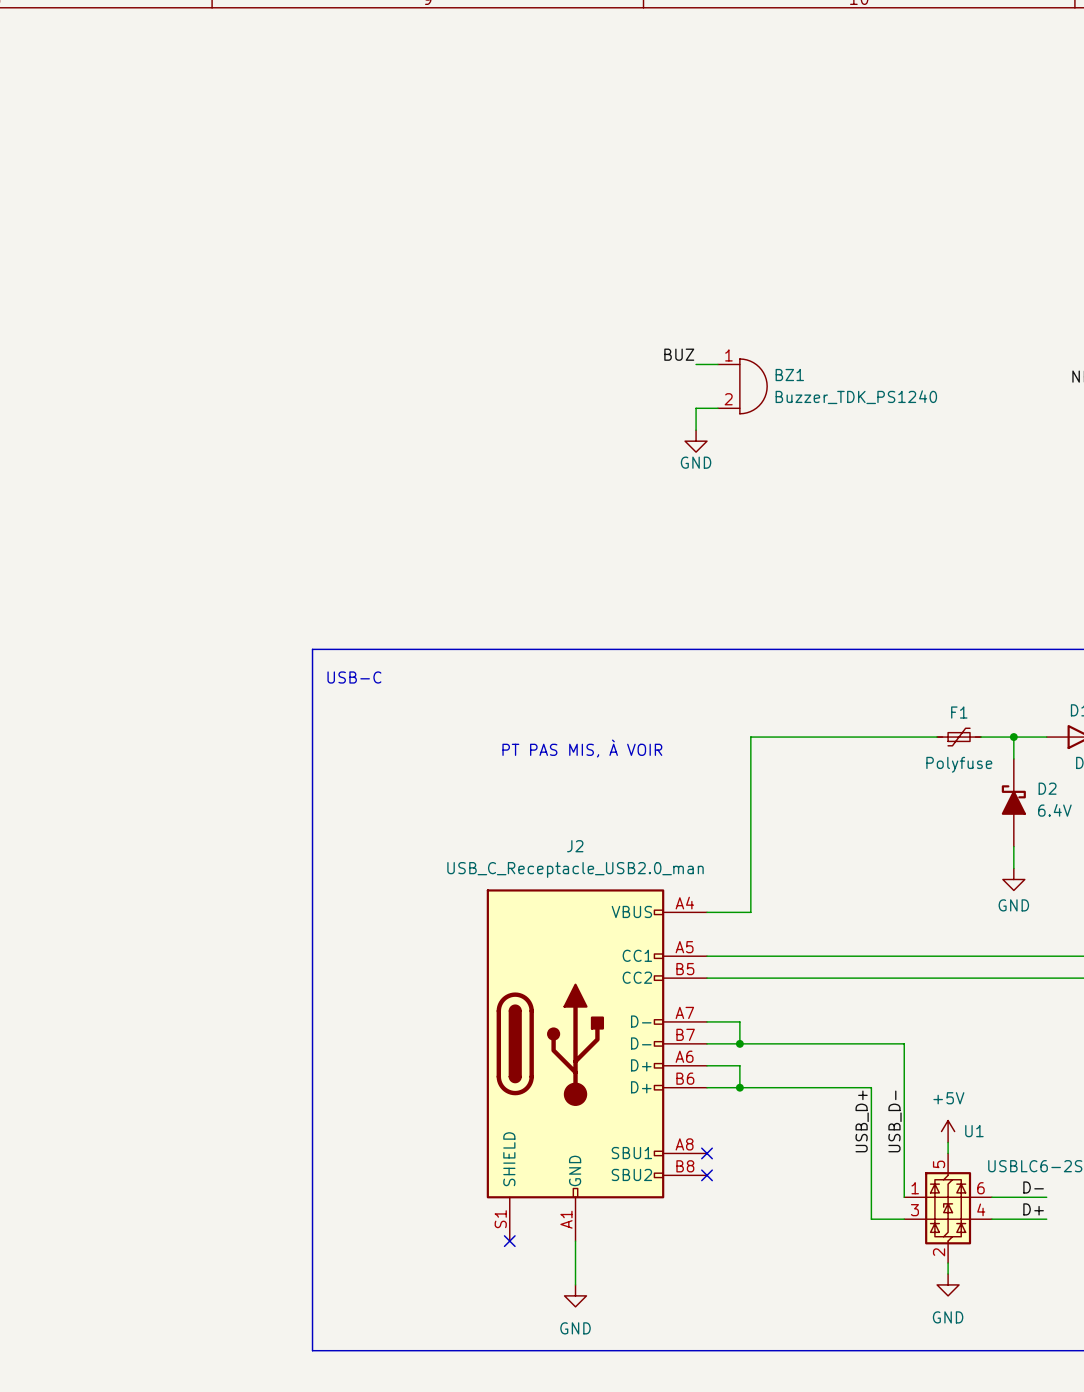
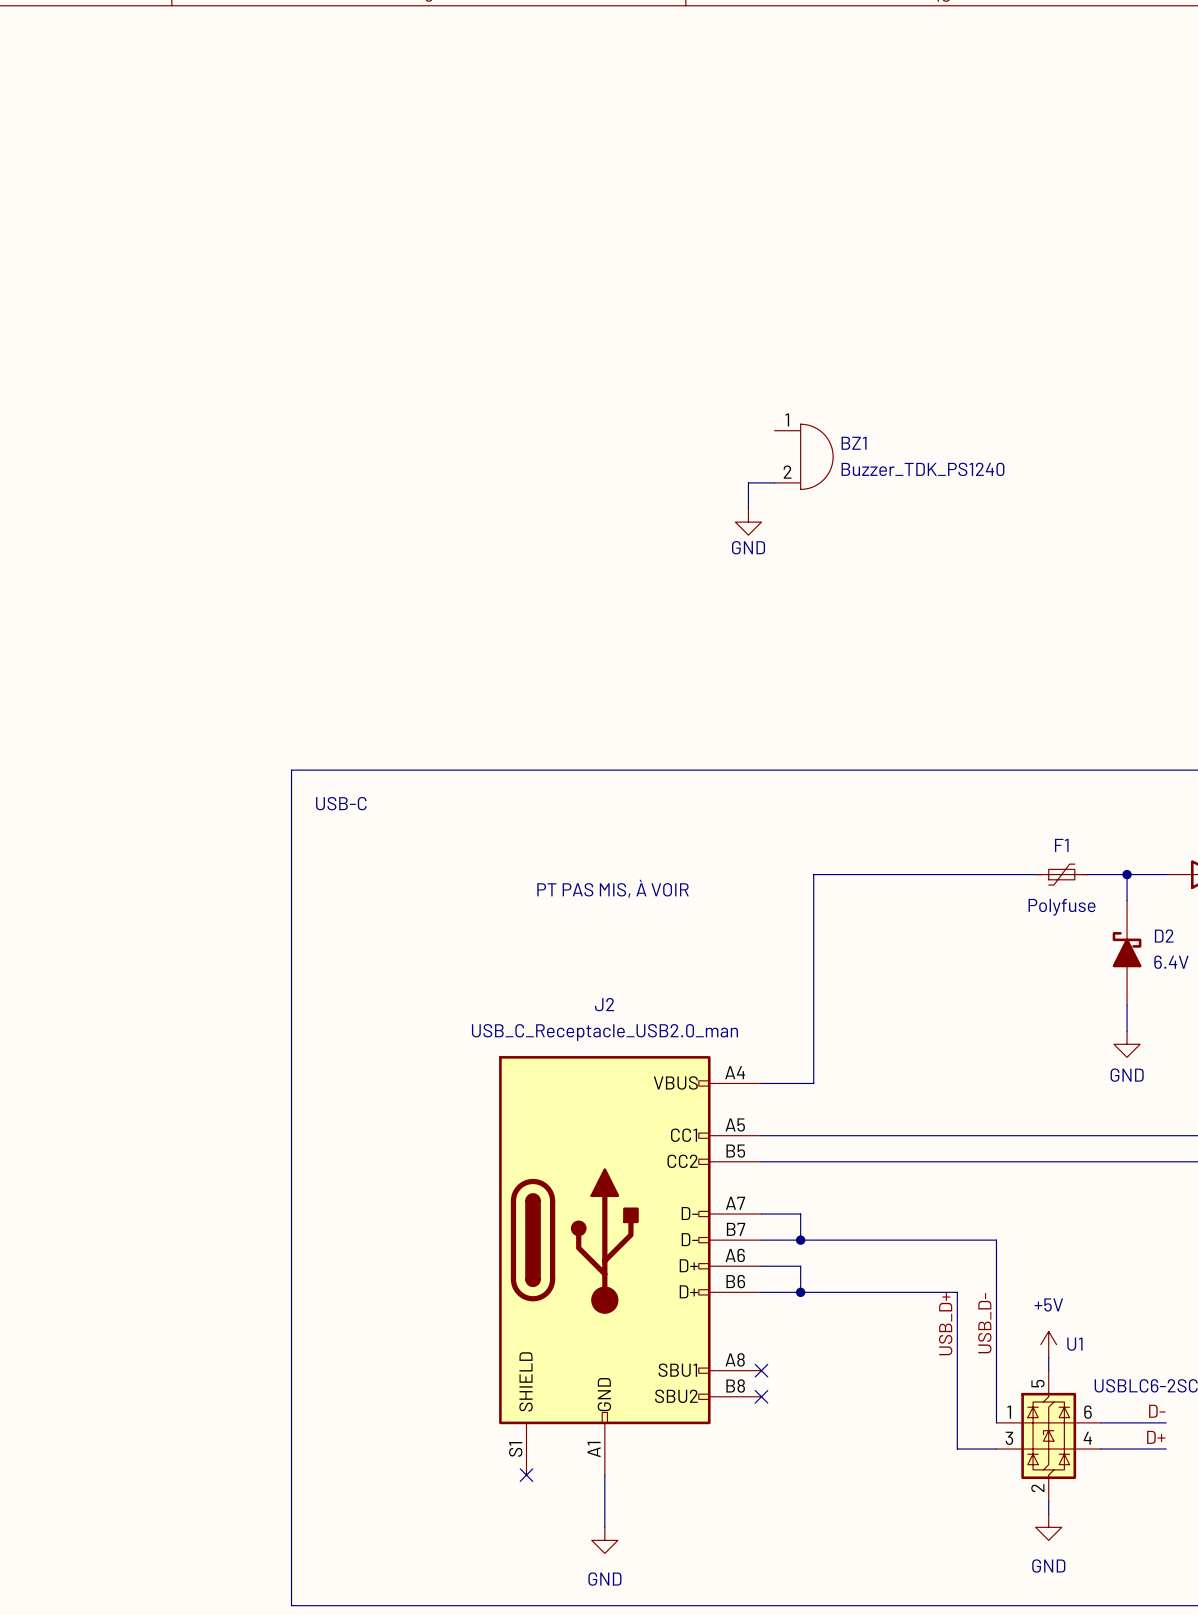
label: BUZ (679, 354) -> none
wire: (696, 364) (717, 364) -> none

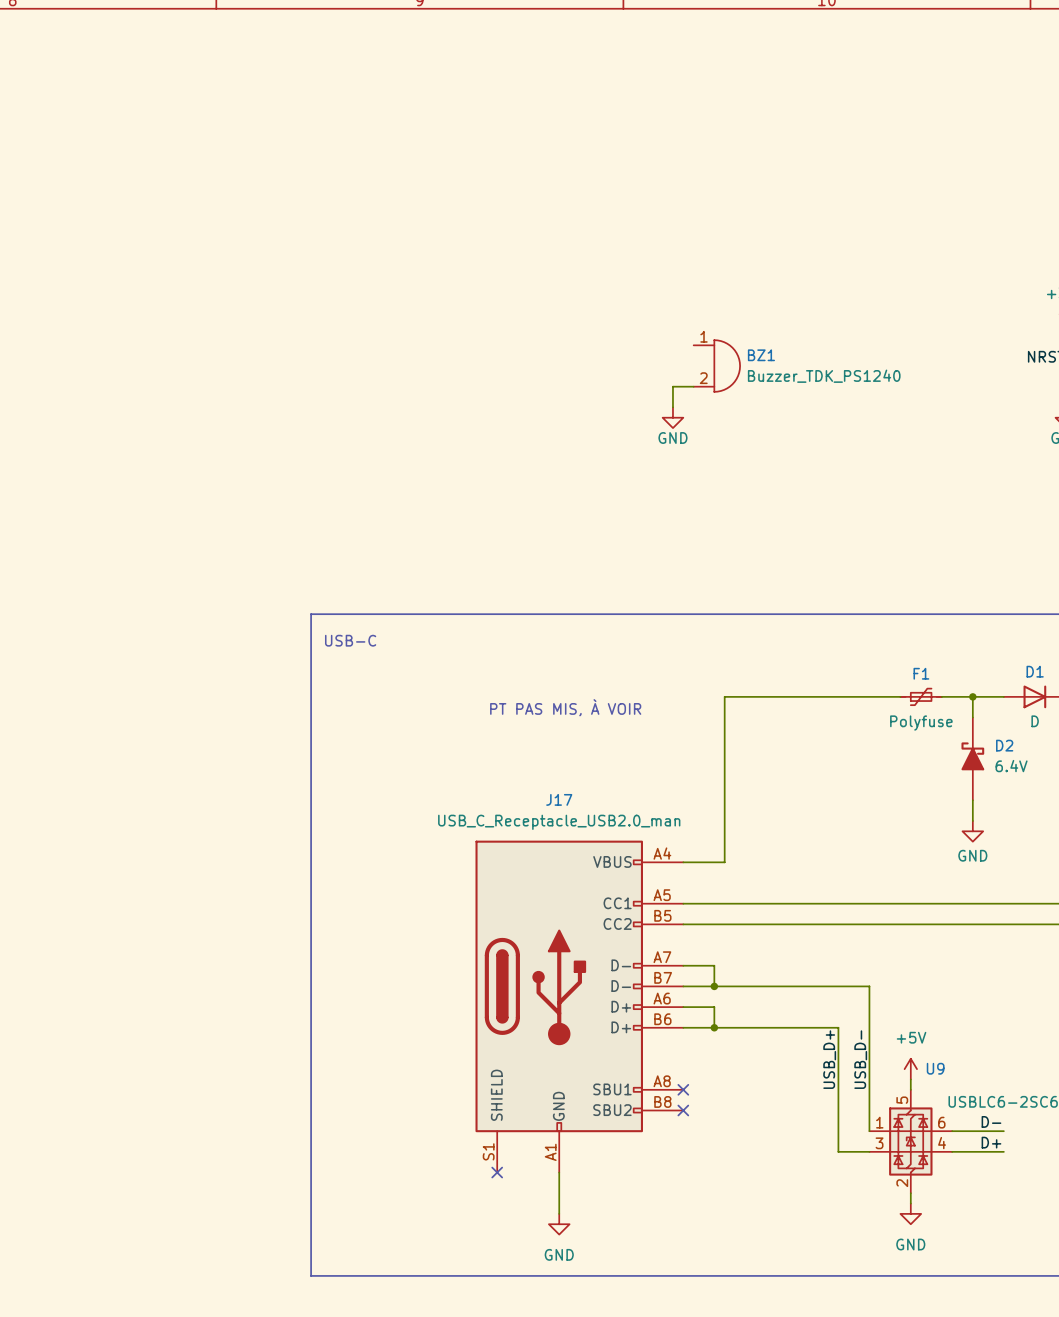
J2 name: J2 (604, 1004) -> J17 (559, 799)
U1 name: U1 (1074, 1344) -> U9 (935, 1068)

